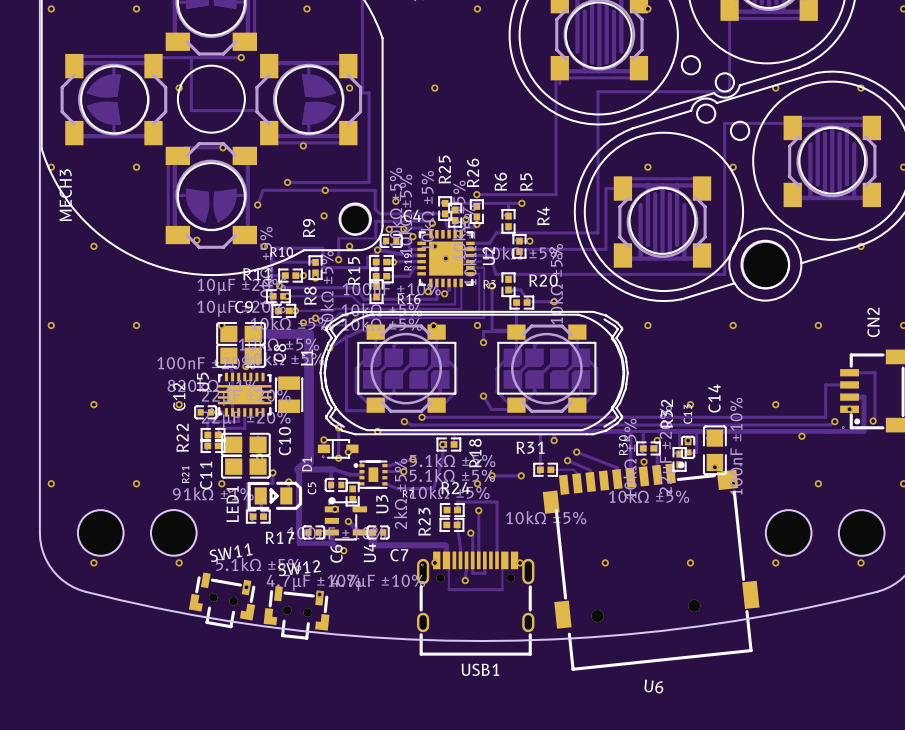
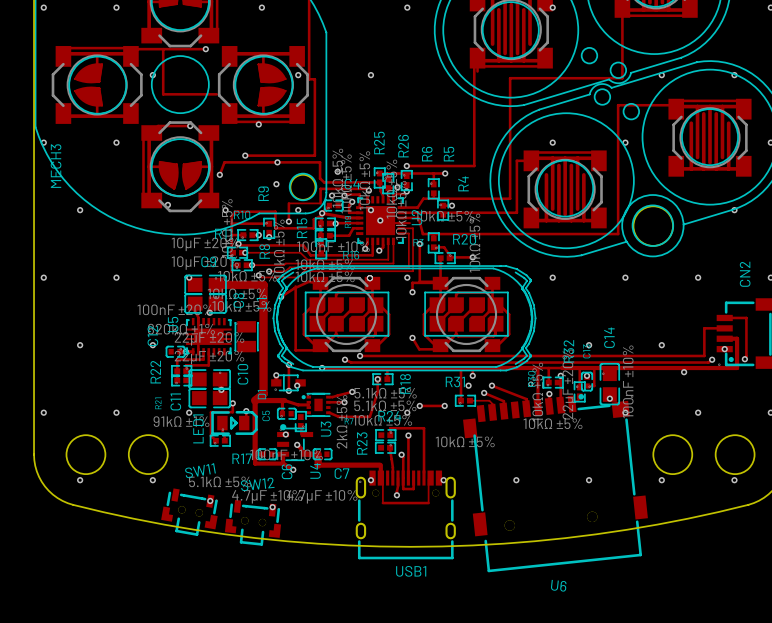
via: none -> (530, 384)
via: none -> (468, 385)

